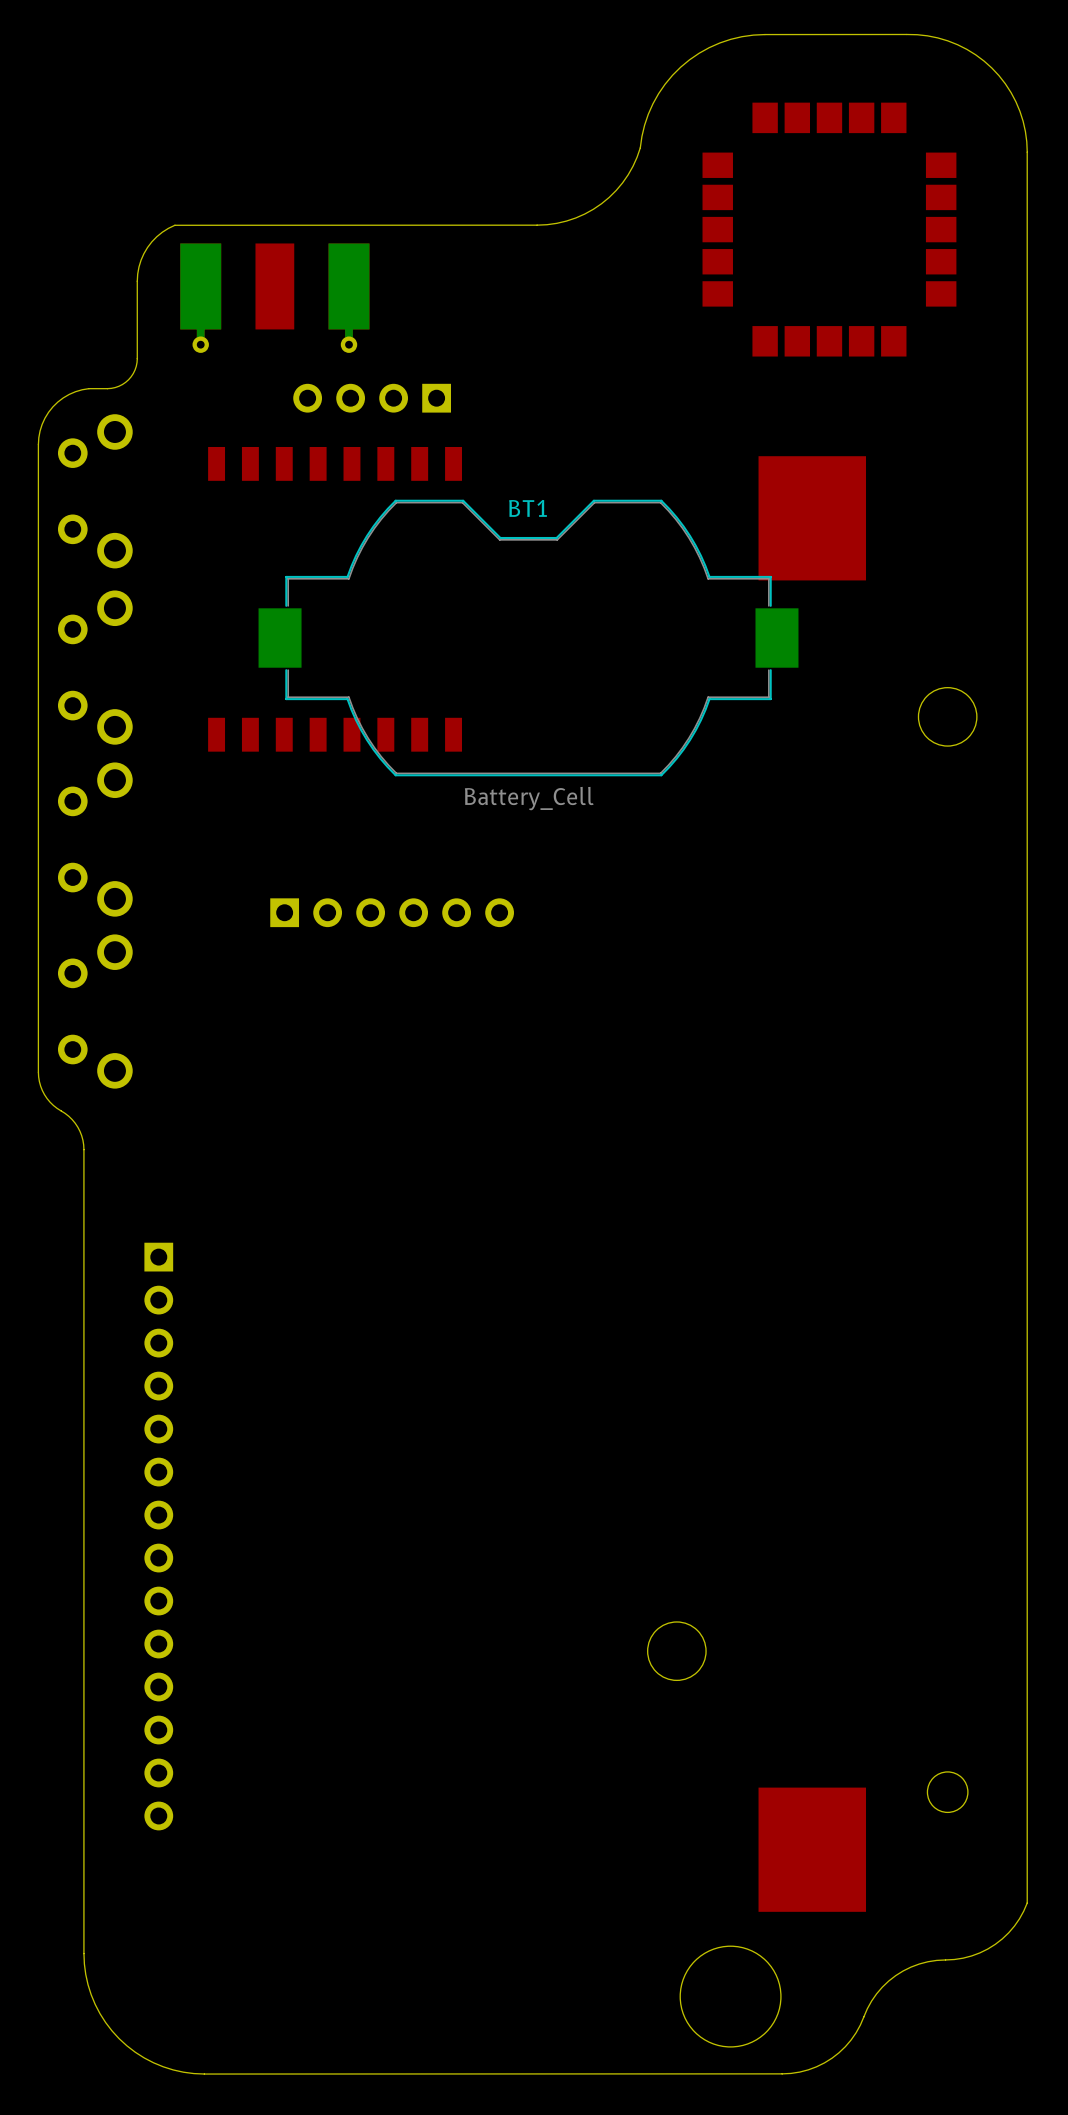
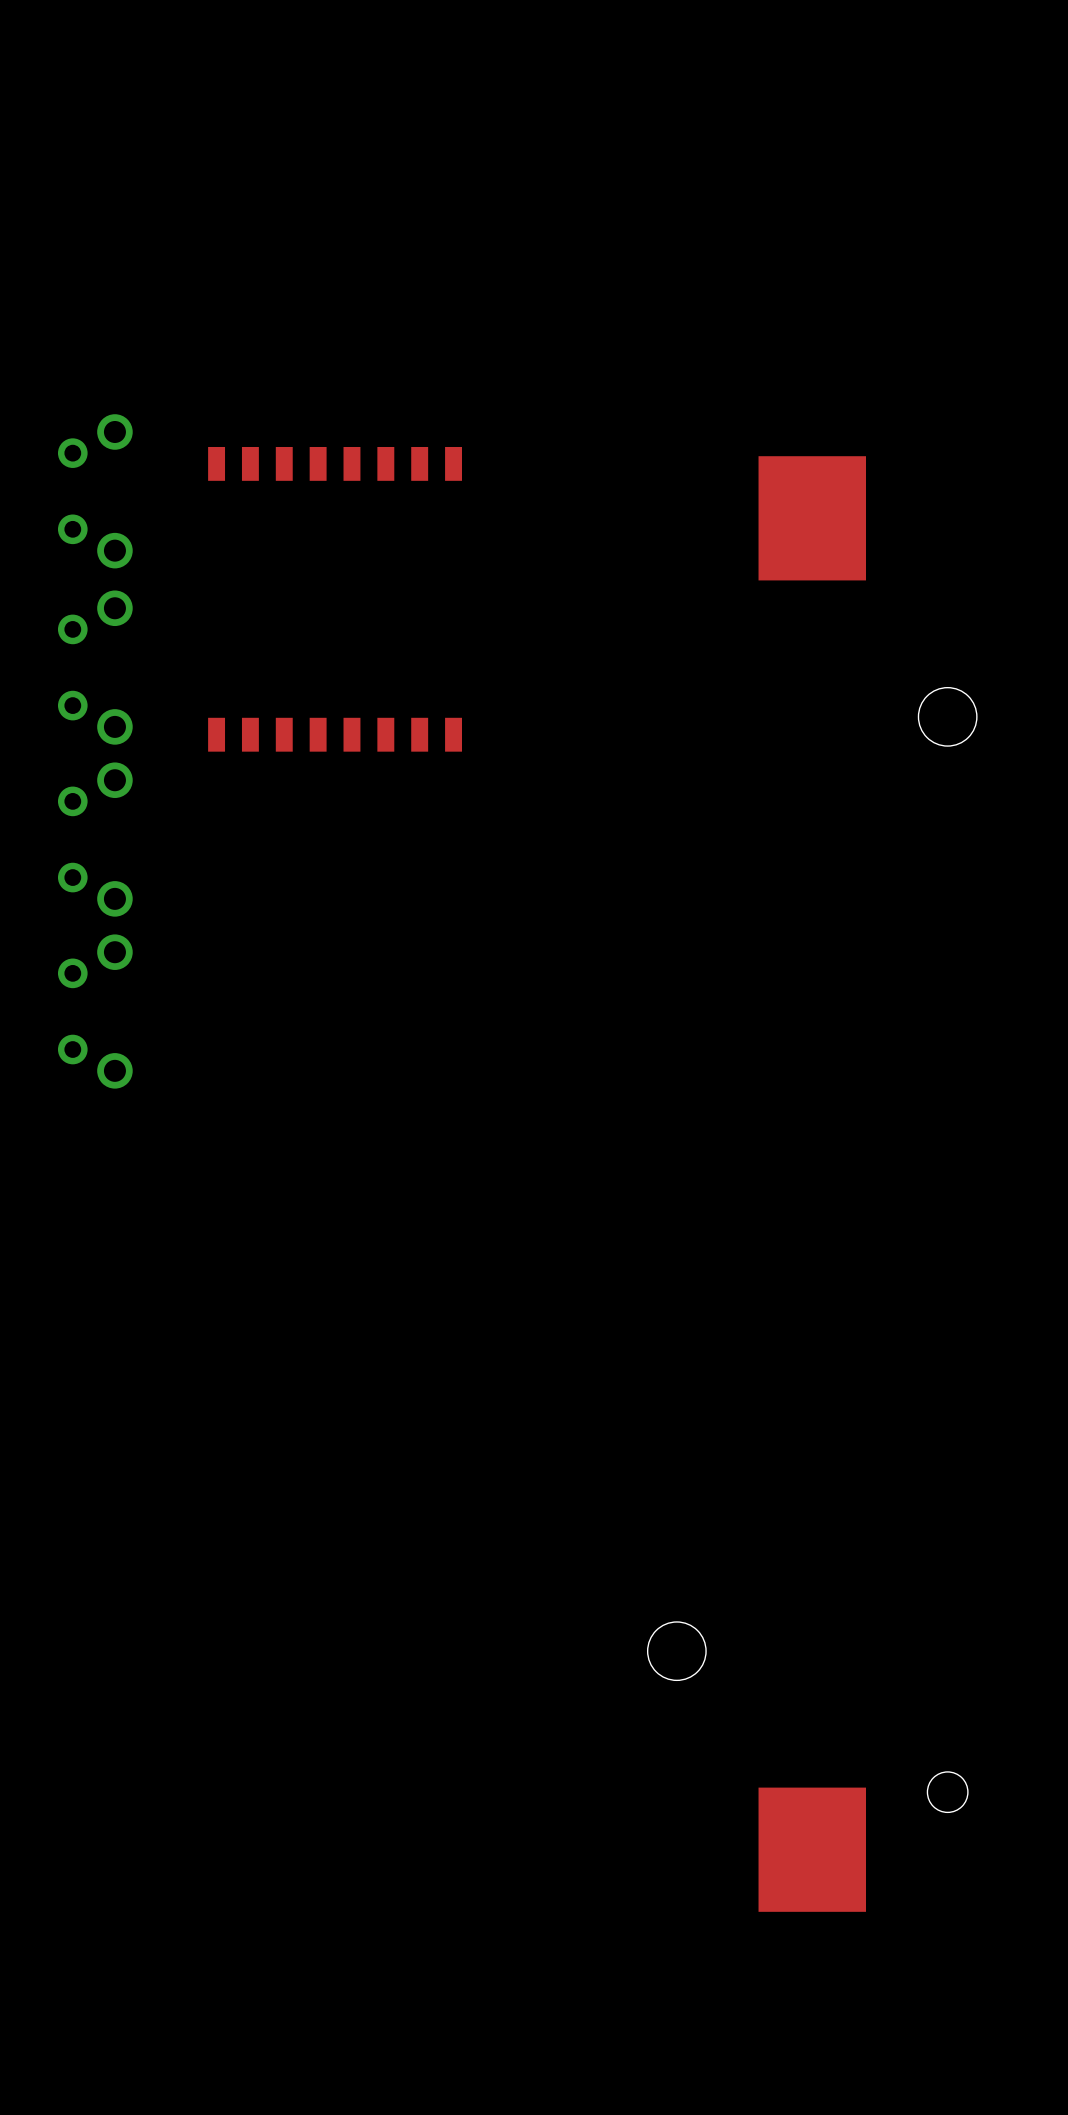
board edge: (906, 34) (753, 35) (730, 39) (709, 47) (680, 67) (658, 93) (648, 114) (637, 157) (622, 182) (609, 197) (593, 209) (566, 221) (537, 225) (174, 225) (162, 232) (151, 241) (143, 253) (138, 267) (137, 362) (131, 376) (125, 382) (115, 387) (89, 388) (69, 394) (52, 406) (42, 424) (38, 444) (38, 1076) (47, 1098) (68, 1116) (77, 1127) (83, 1149) (84, 1964) (88, 1984) (95, 2004) (112, 2031) (135, 2052) (163, 2066) (183, 2072) (204, 2074) (782, 2073) (799, 2072) (824, 2062) (845, 2046) (856, 2032) (876, 1993) (895, 1975) (919, 1963) (963, 1958) (987, 1948) (1002, 1938) (1014, 1926) (1027, 1903) (1026, 141) (1019, 111) (1011, 92) (998, 75) (984, 61) (966, 49) (947, 40) (927, 35) (906, 34) -> none
part: (829, 229) -> none
part: (274, 298) -> none
part: (372, 398) -> none
BT1: Battery_Cell (528, 638) -> none
part: (392, 912) -> none
part: (158, 1536) -> none
round board edge: [679, 1945, 782, 2048] -> none

